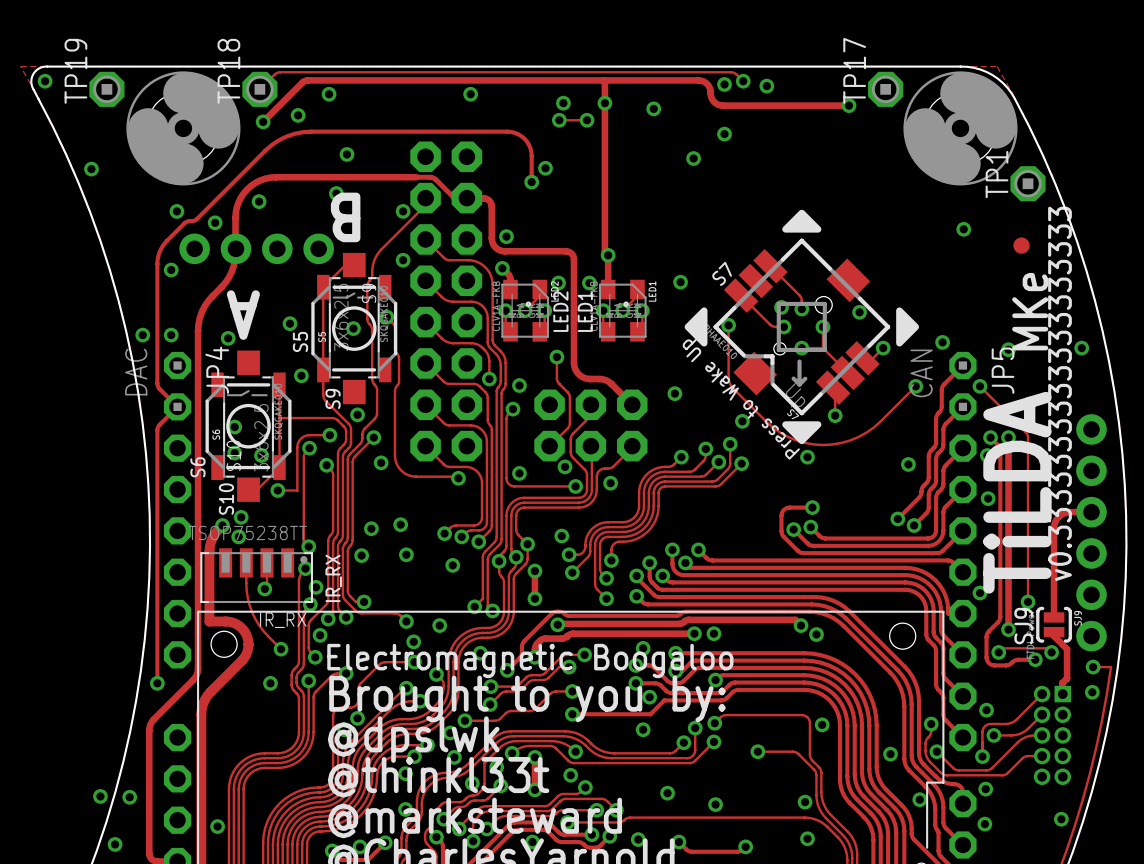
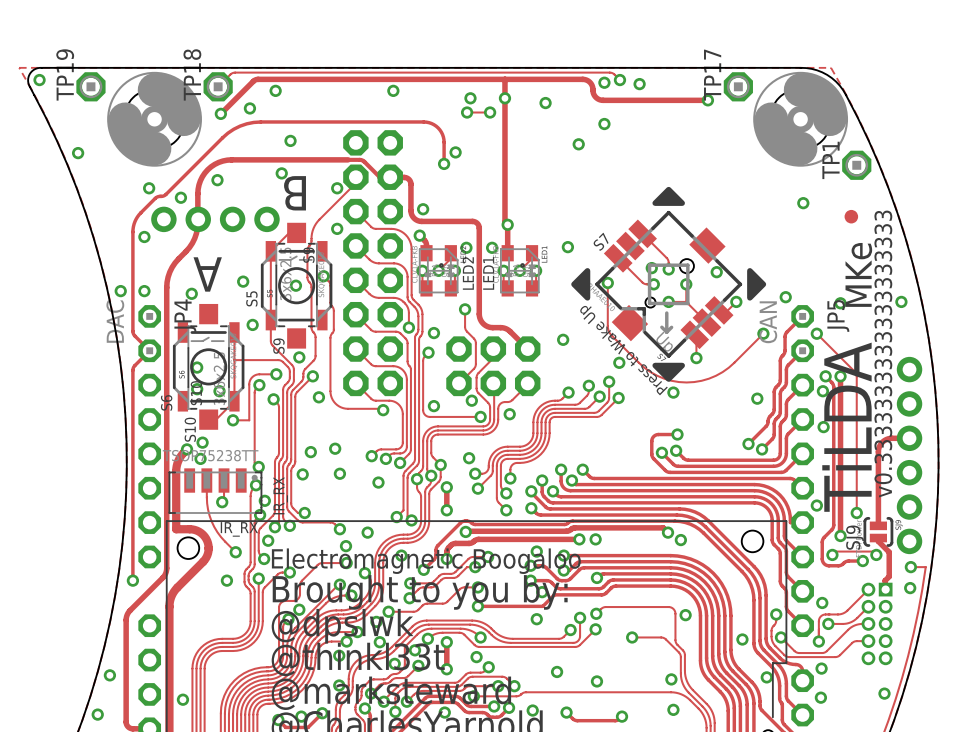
via: (100, 796) -> none

